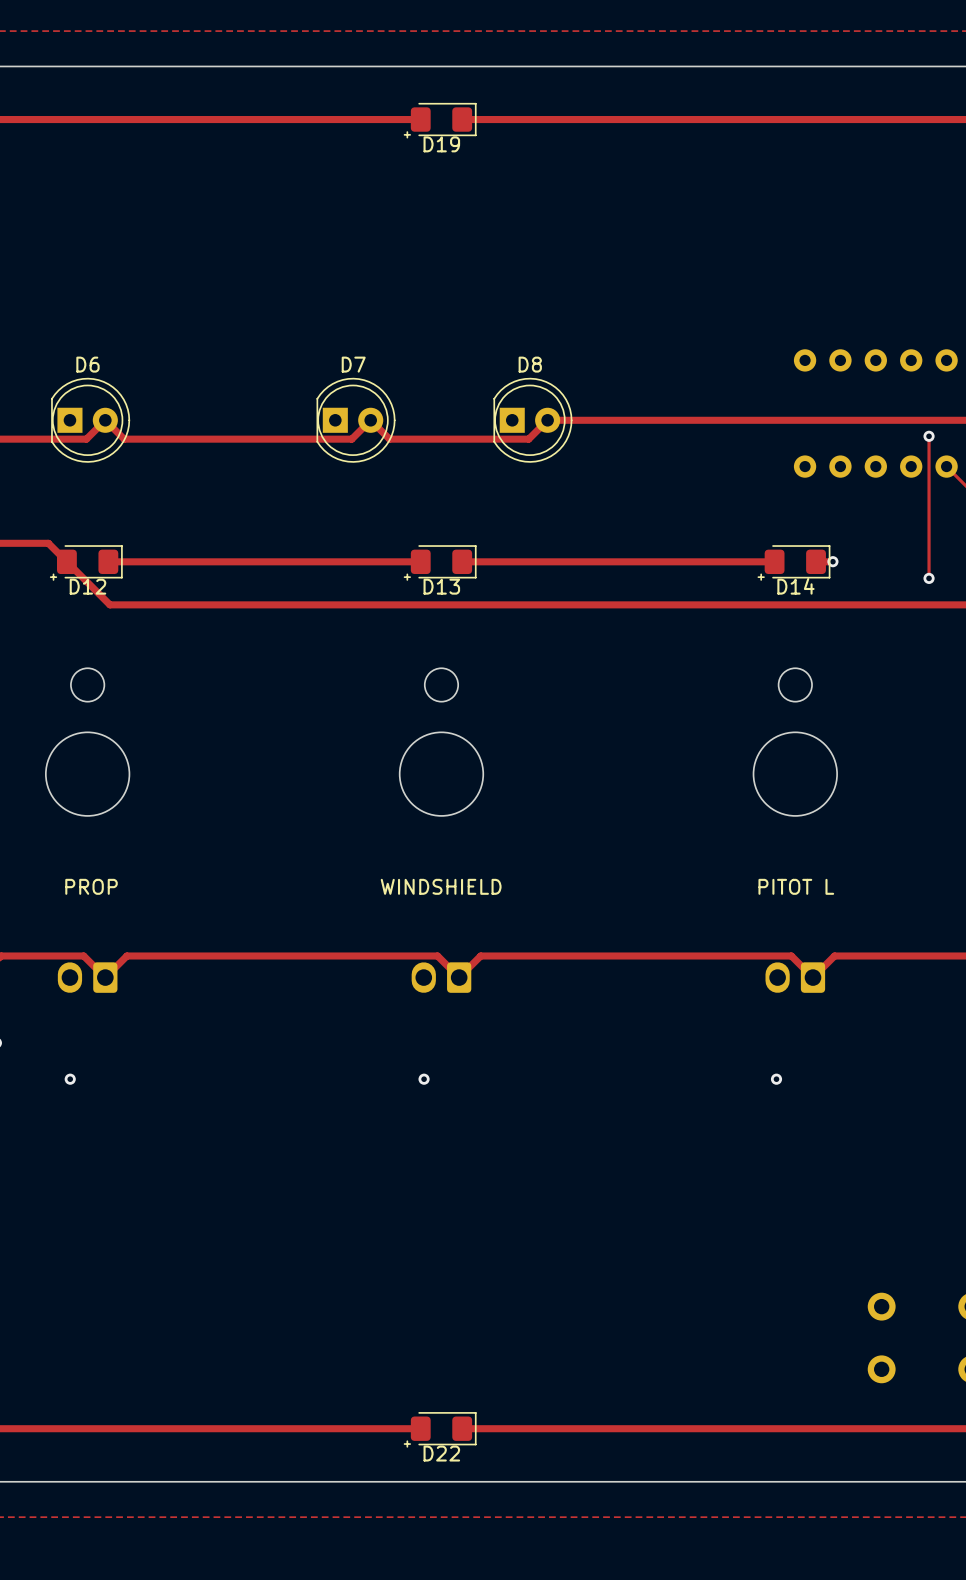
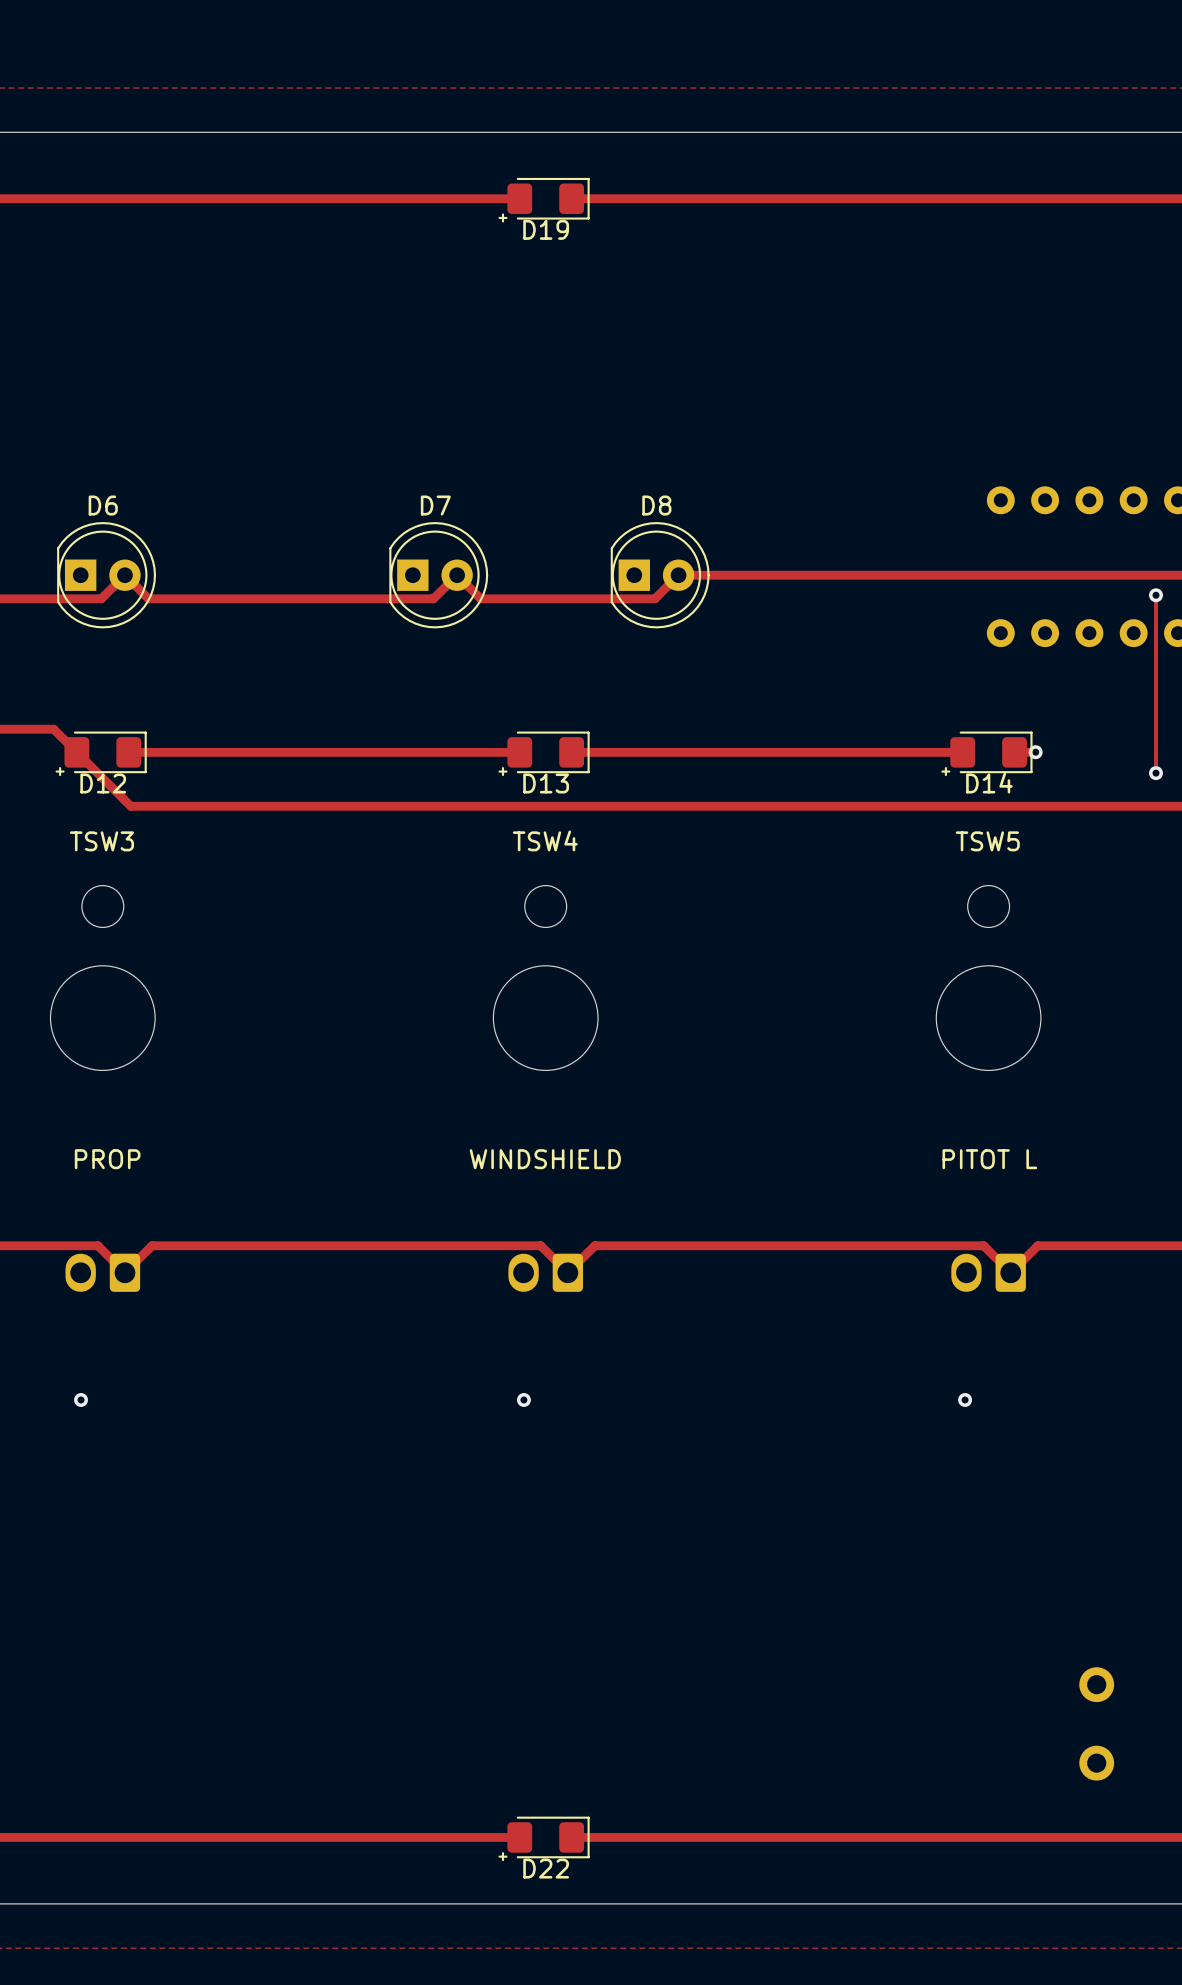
TSW3 name: none -> TSW3 (101, 841)
TSW4 name: none -> TSW4 (545, 840)
TSW5 name: none -> TSW5 (987, 841)

